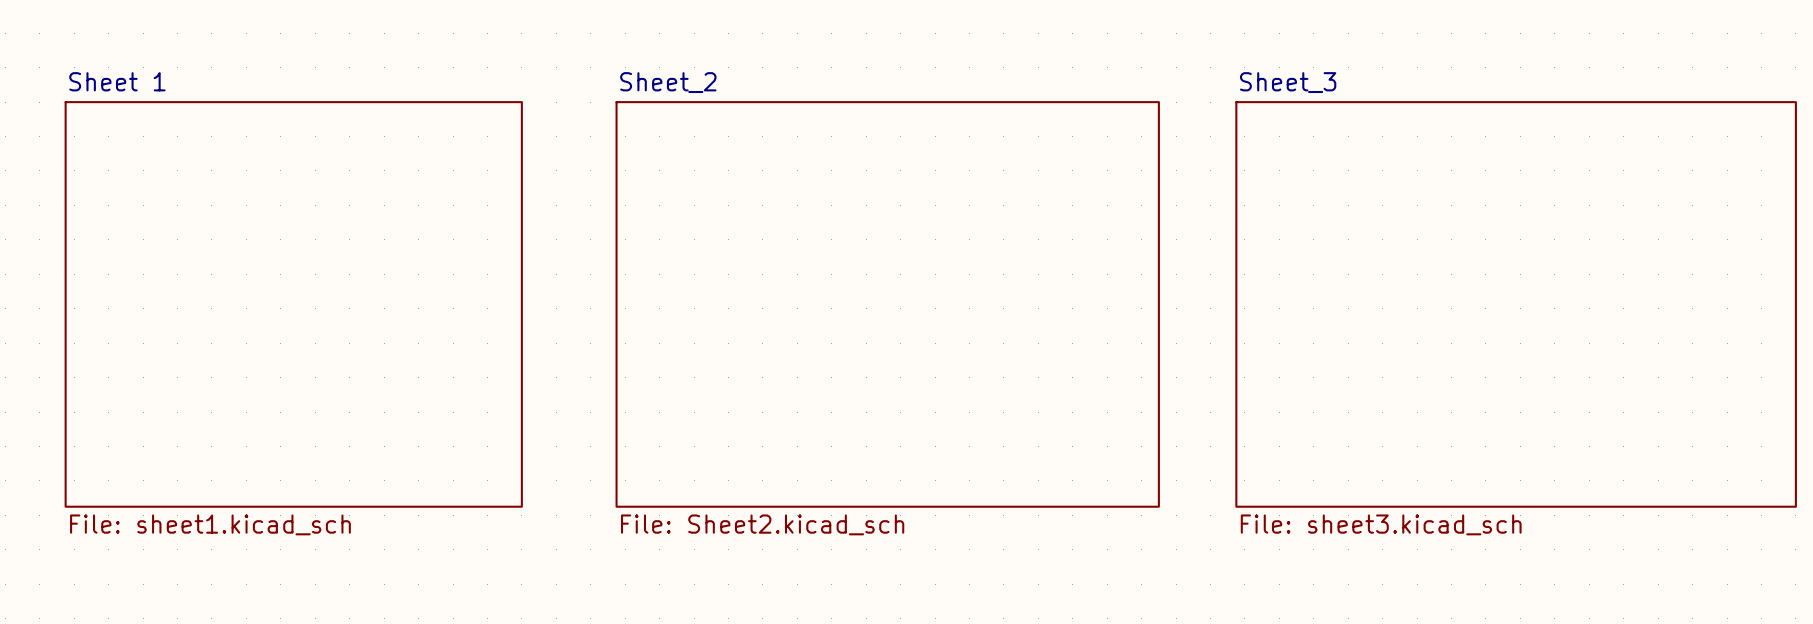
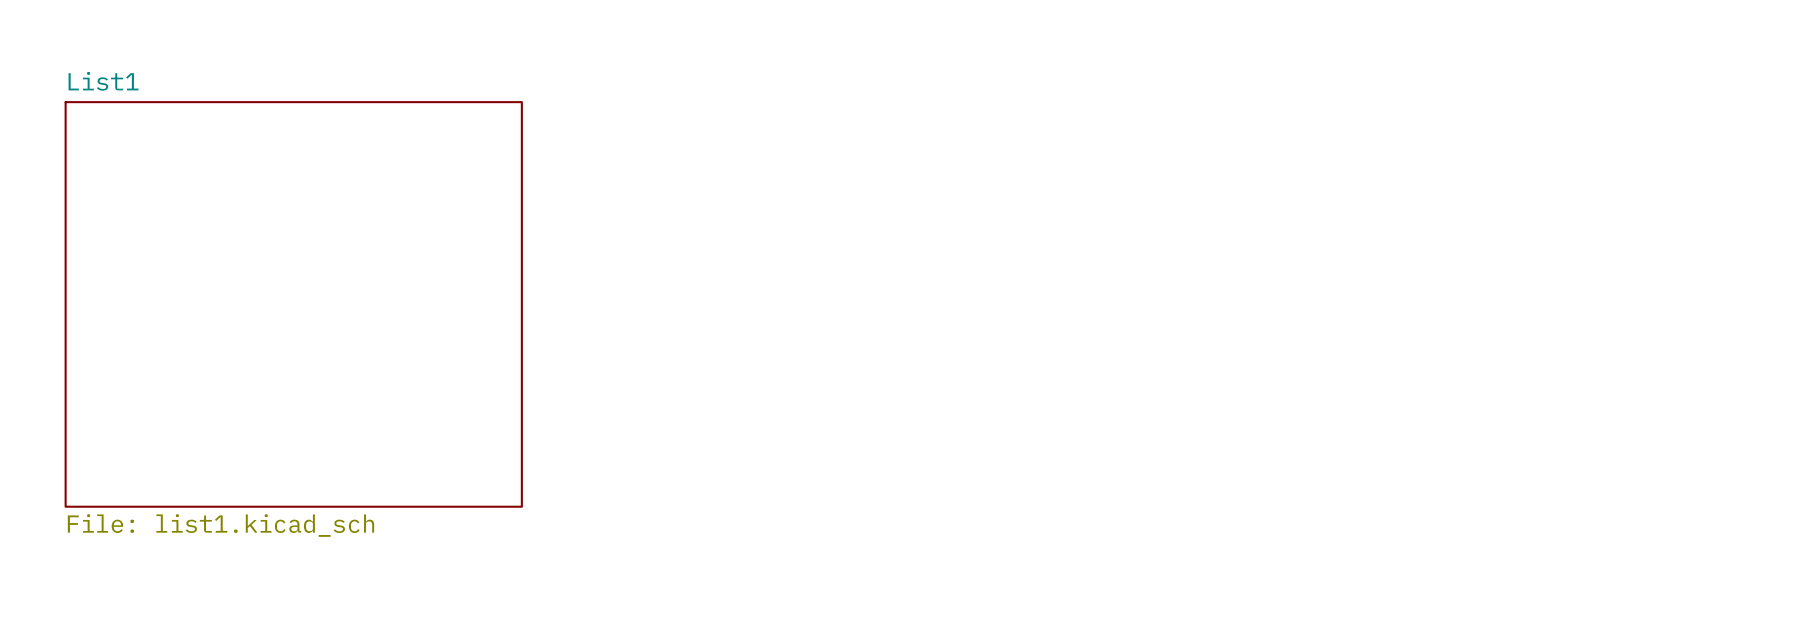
sheet Sheet 1 name: Sheet 1 (117, 81) -> List1 (103, 81)
sheet Sheet_2: File: Sheet2.kicad_sch (887, 304) -> none
sheet Sheet_3: File: sheet3.kicad_sch (1516, 304) -> none
sheet Sheet 1 value: File: sheet1.kicad_sch (210, 524) -> File: list1.kicad_sch (221, 525)

